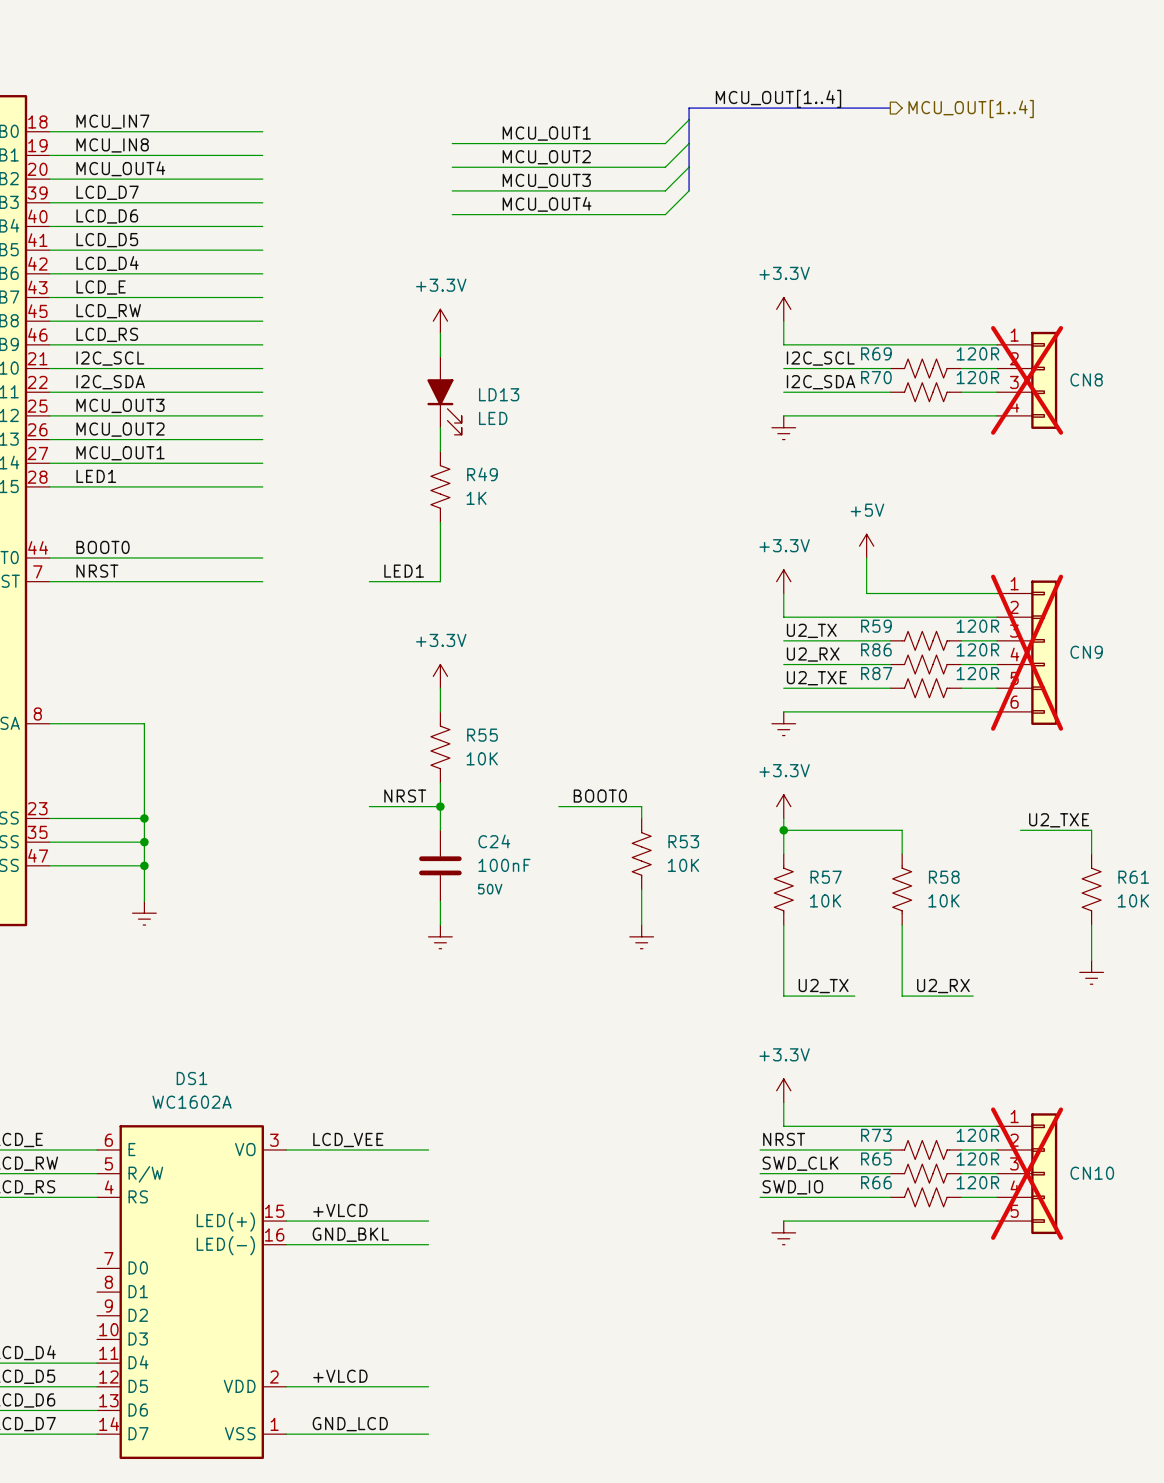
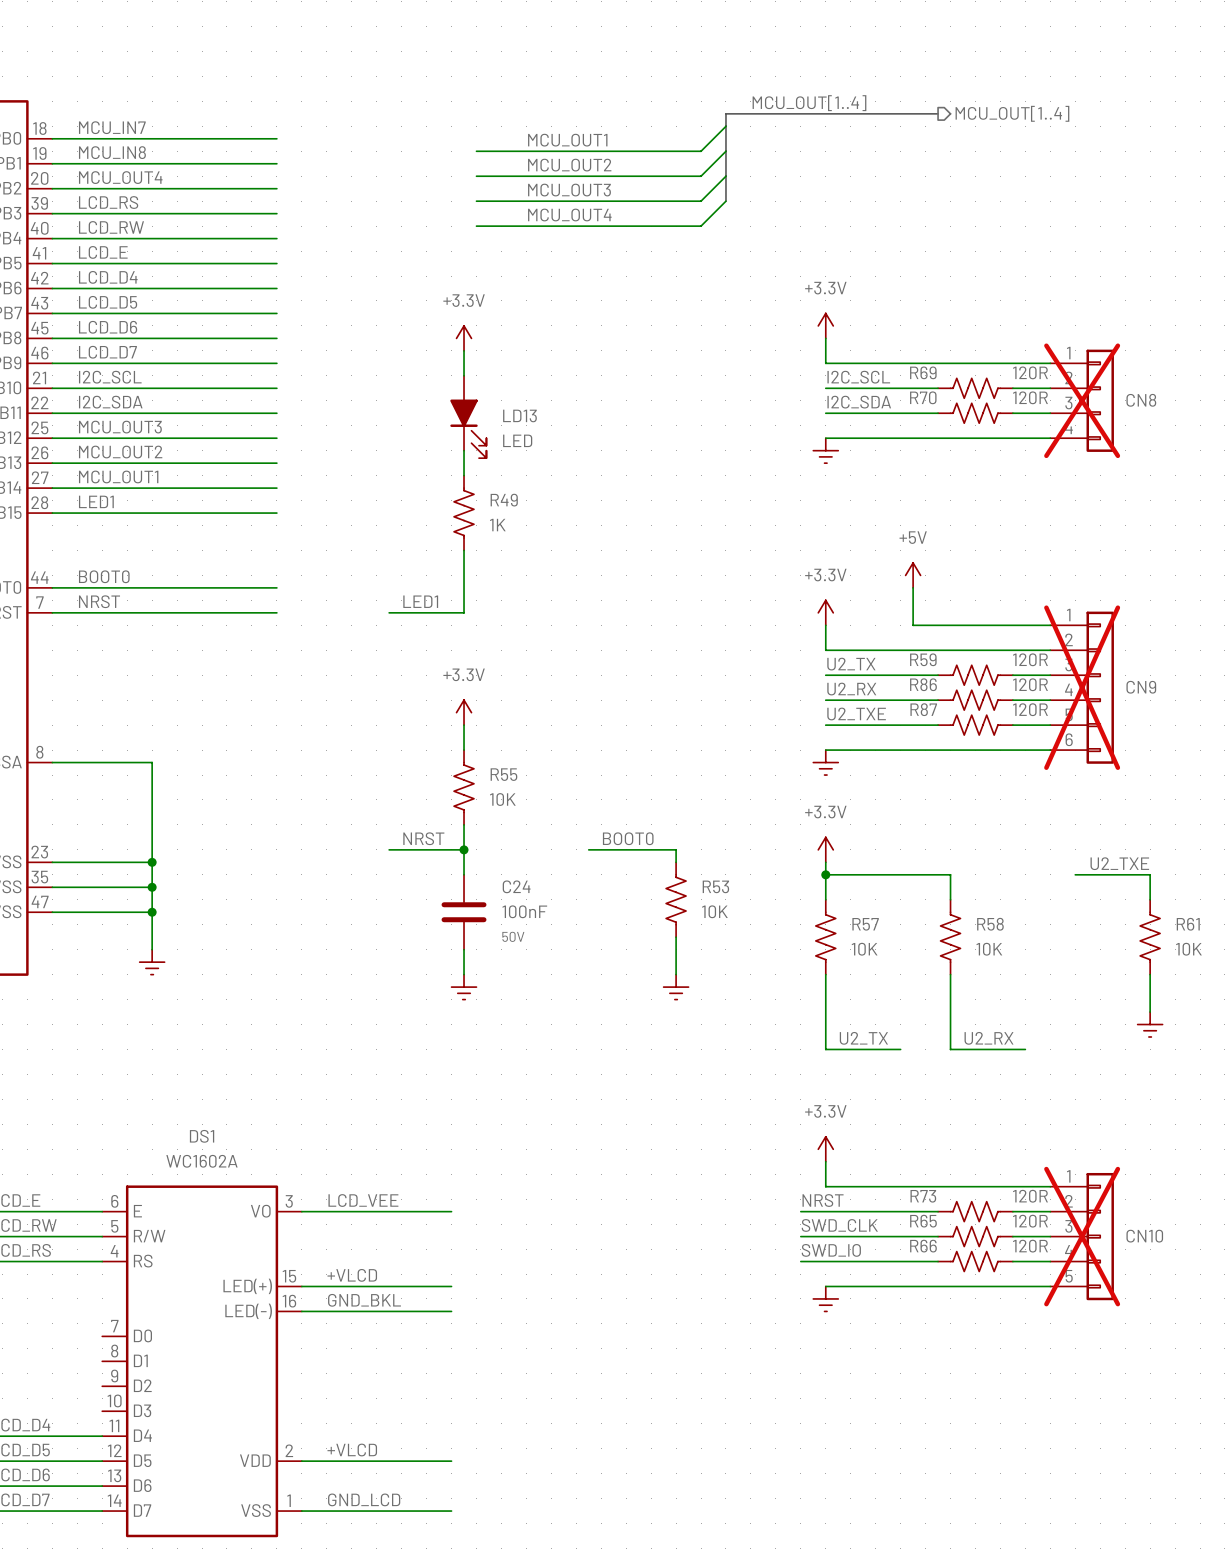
label: LCD_D7 (107, 192) -> LCD_RS (108, 202)
label: LCD_D6 (107, 216) -> LCD_RW (111, 227)
label: LCD_D5 (107, 240) -> LCD_E (103, 252)
label: LCD_E (101, 287) -> LCD_D5 (108, 302)
label: LCD_RW (108, 311) -> LCD_D6 (108, 327)
label: LCD_RS (107, 334) -> LCD_D7 (107, 352)

